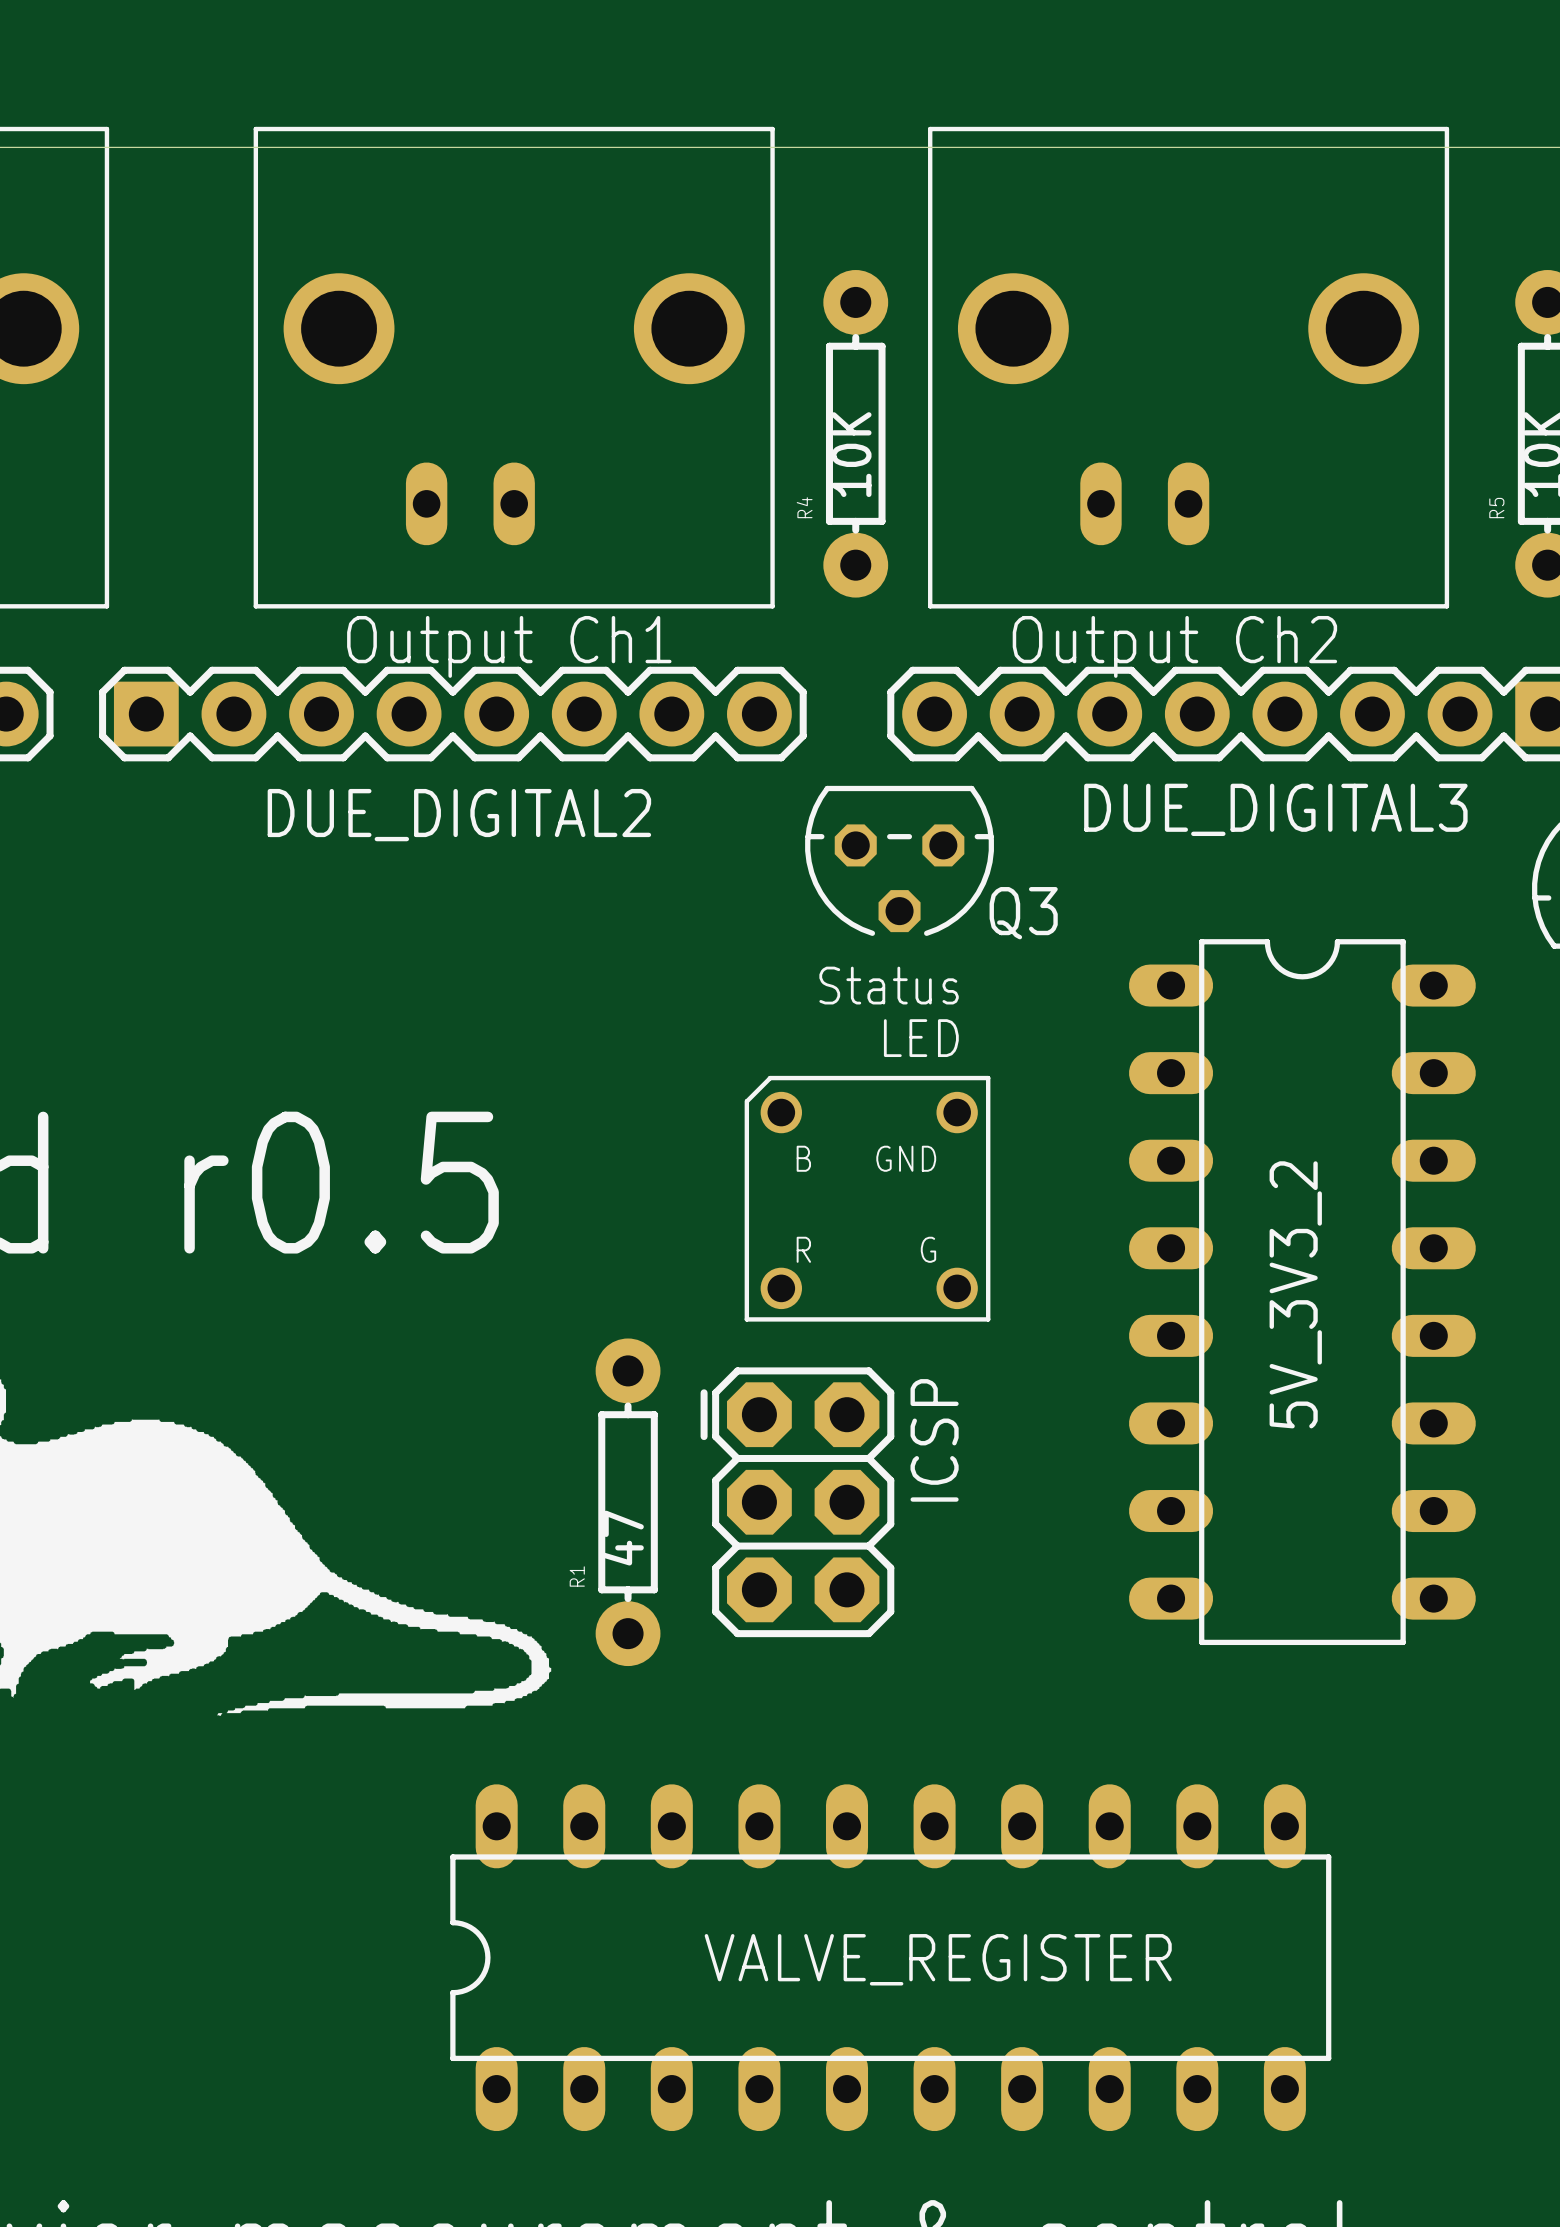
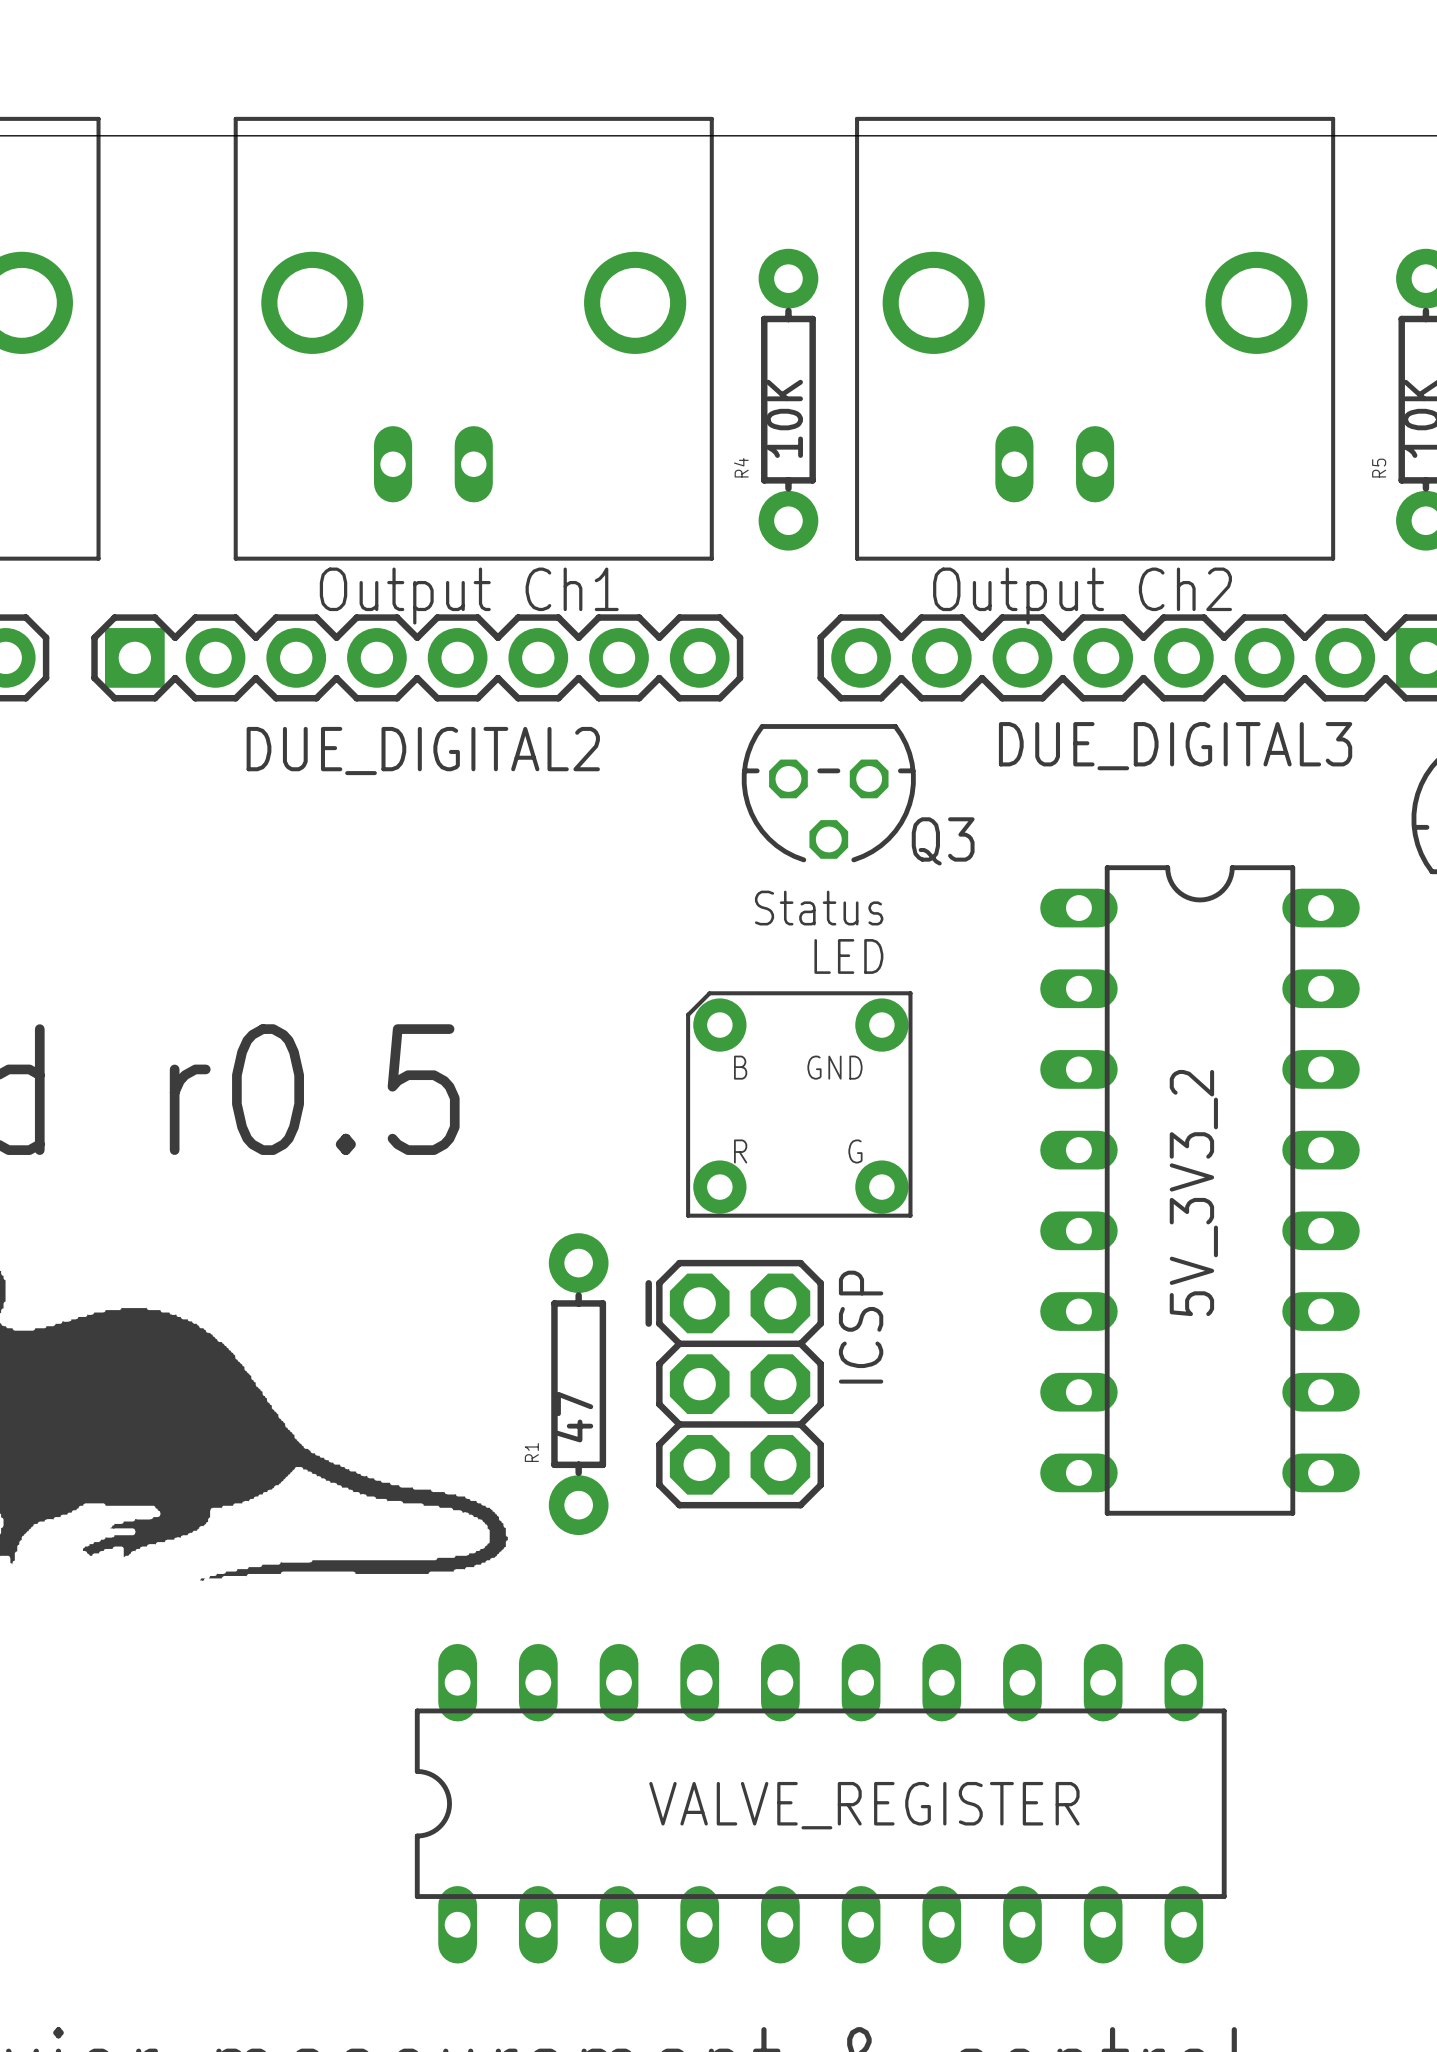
part footprint: [744, 1075, 991, 1322] -> [686, 991, 913, 1218]

